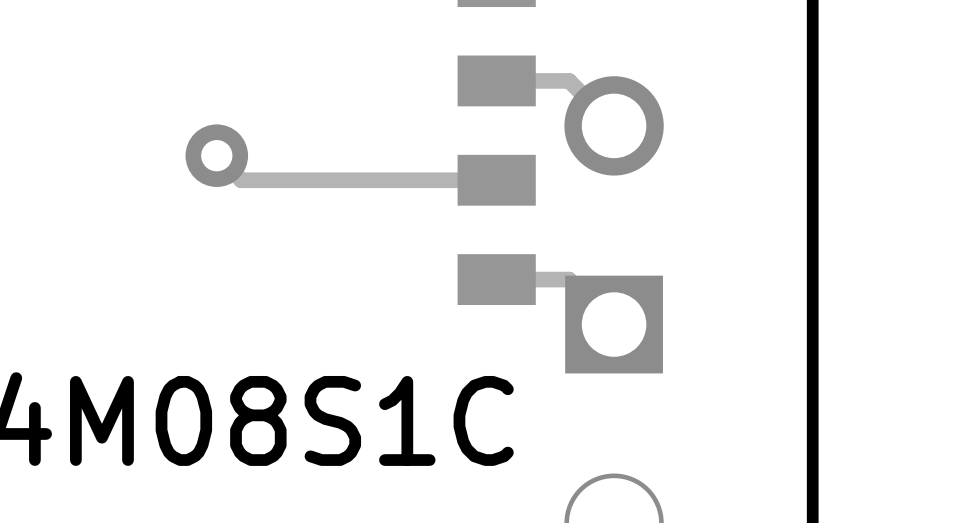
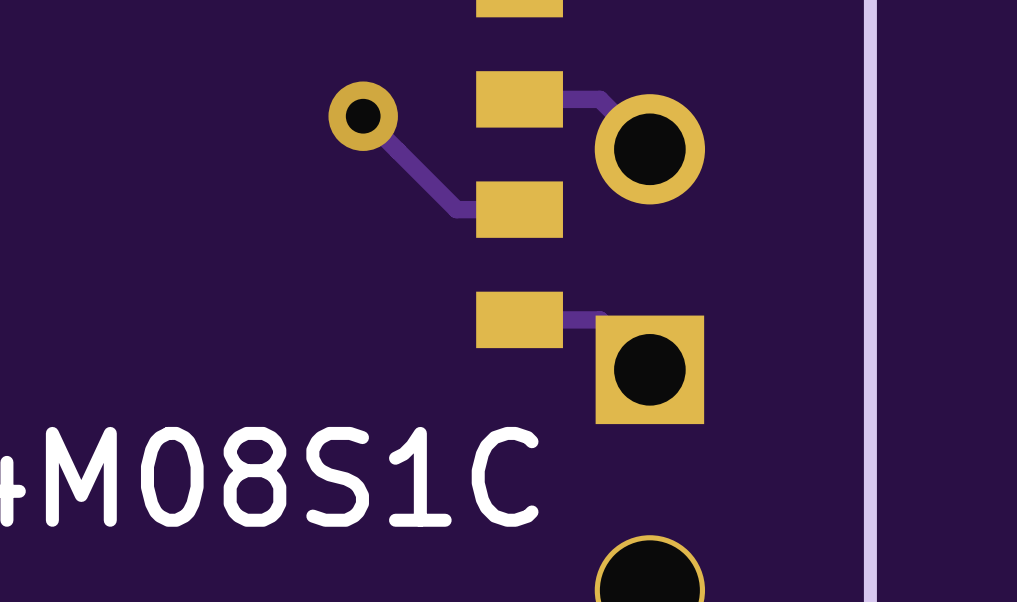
track: (216, 155) (241, 180) (439, 180) -> (363, 116) (456, 209)
via position: (216, 155) -> (363, 116)

